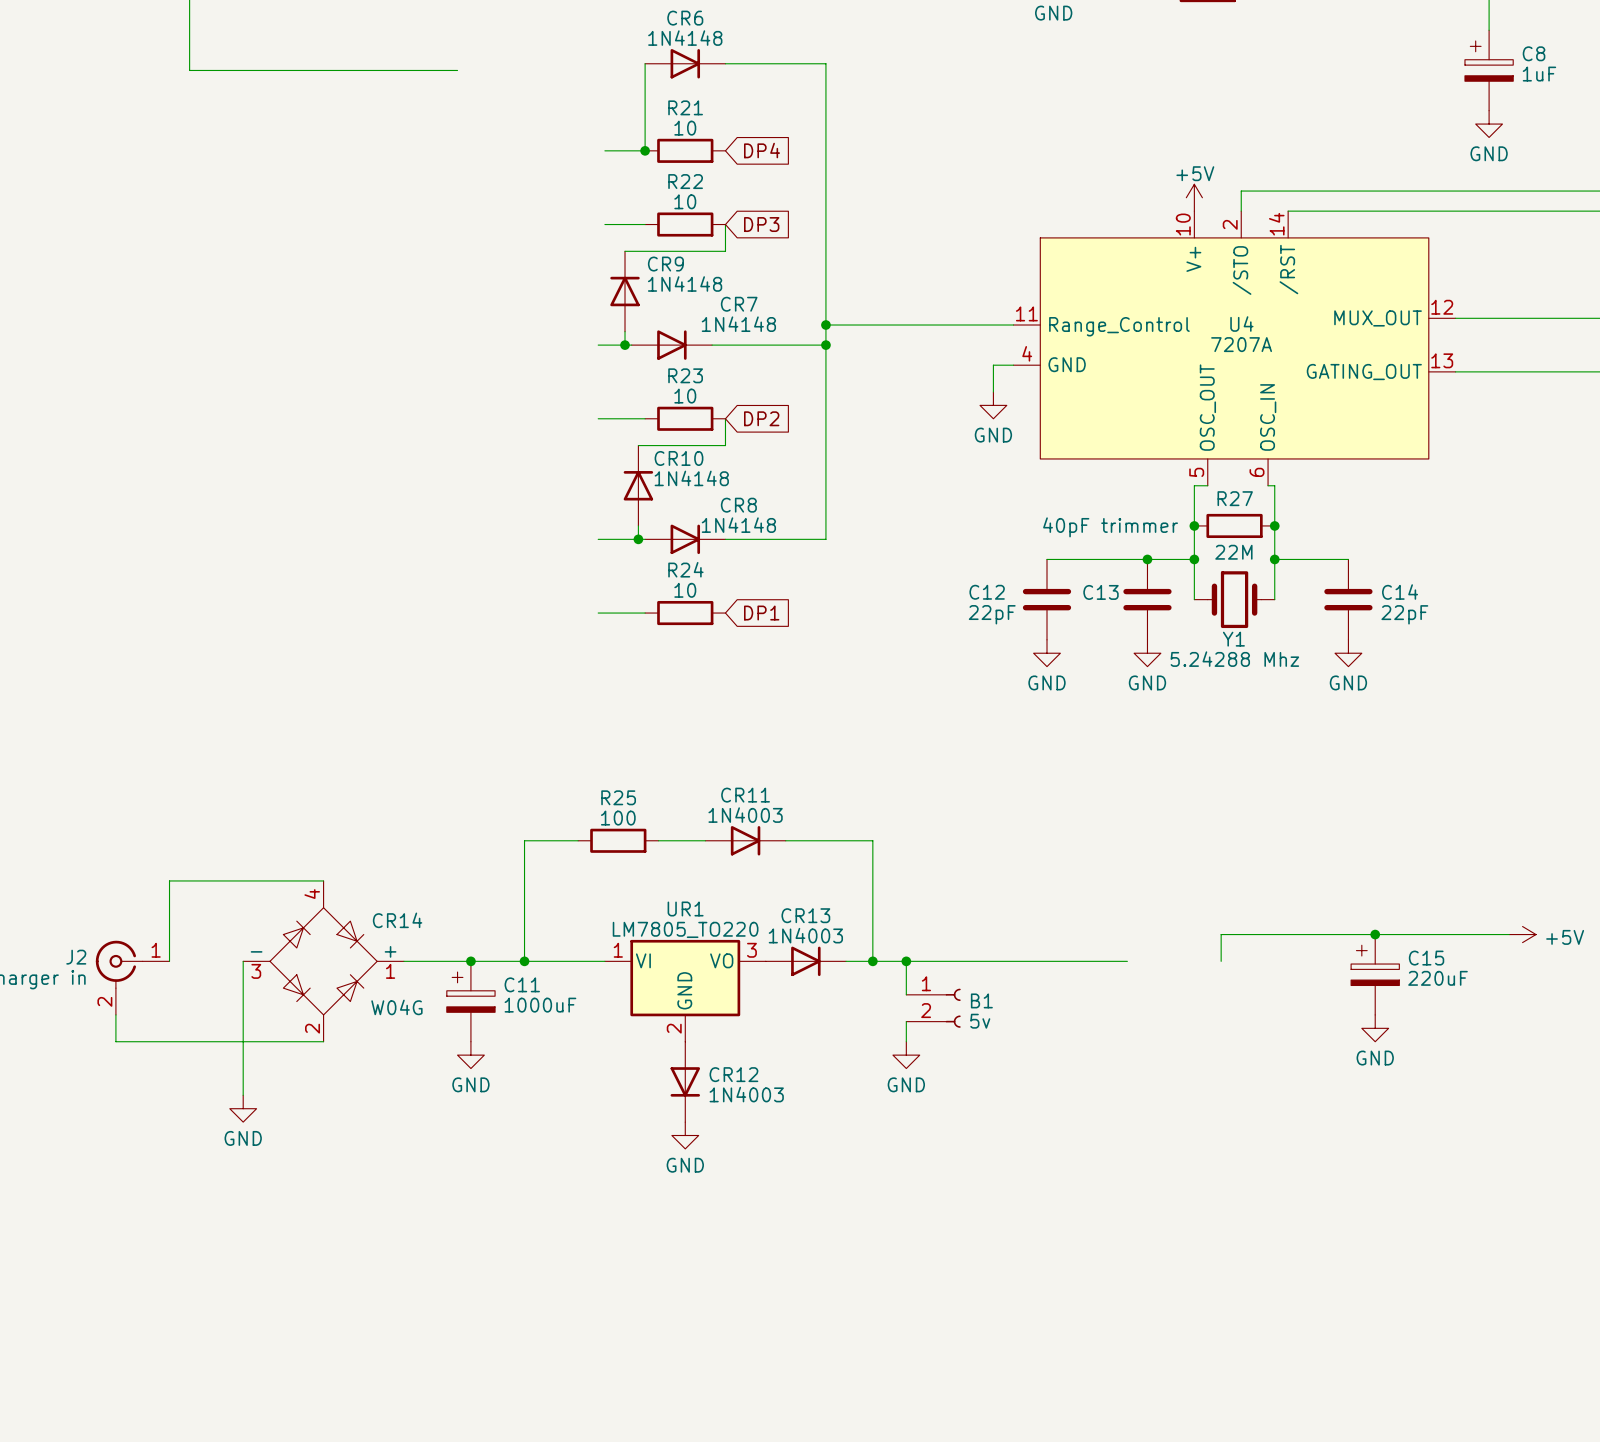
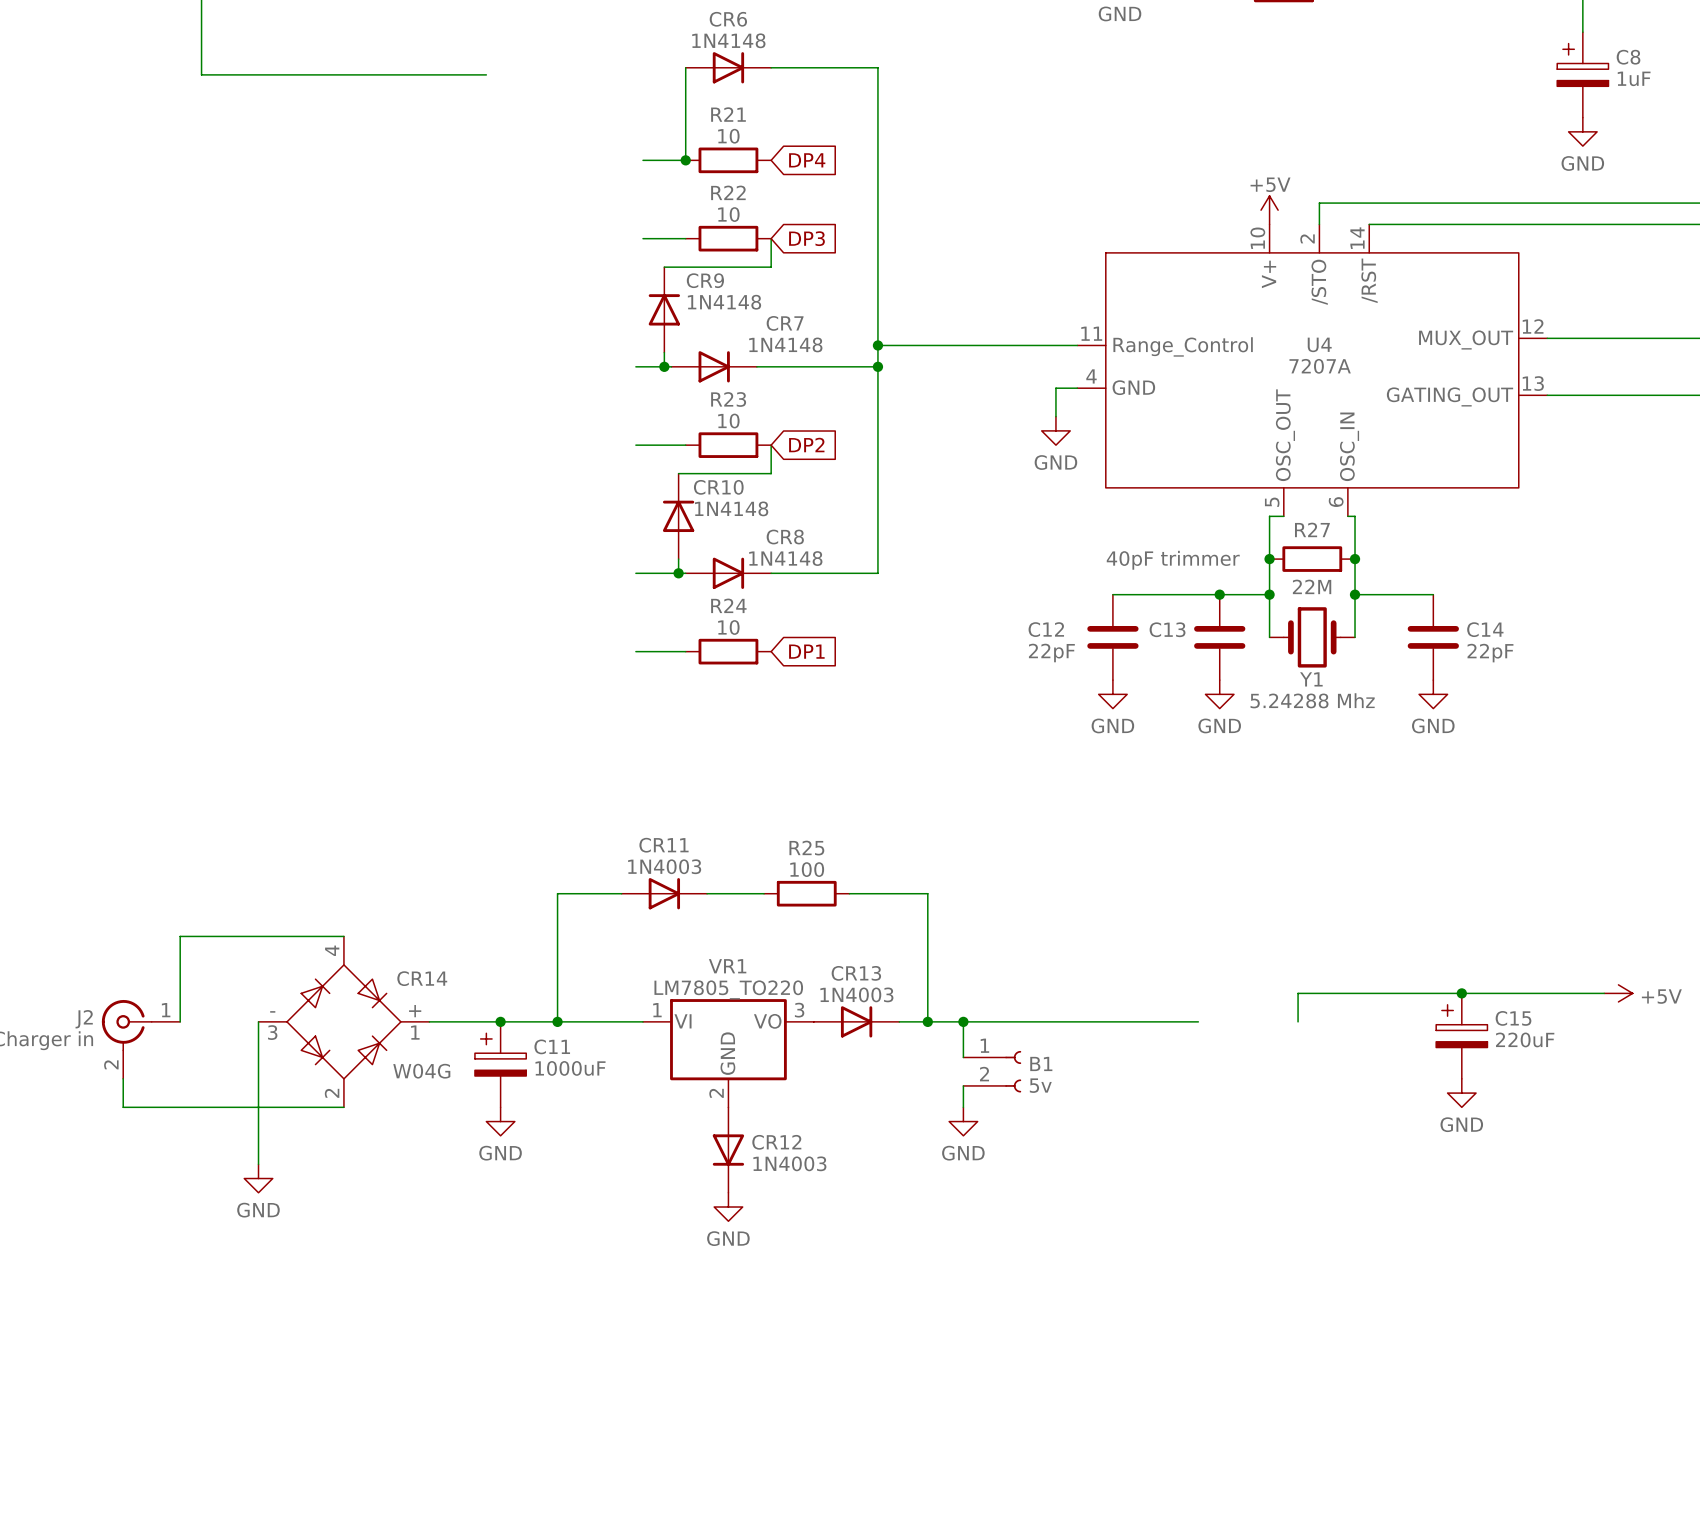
R25 position: (618, 840) -> (806, 893)
CR11 position: (745, 840) -> (664, 893)
UR1 name: UR1 (685, 909) -> VR1 (727, 966)

